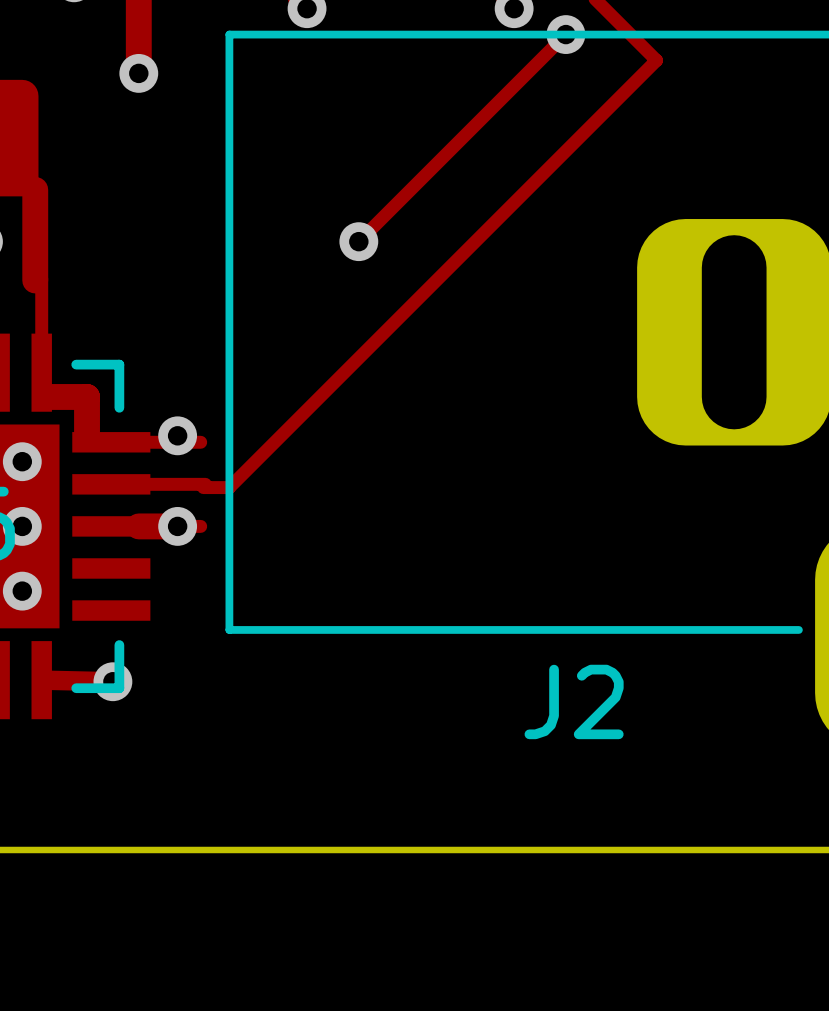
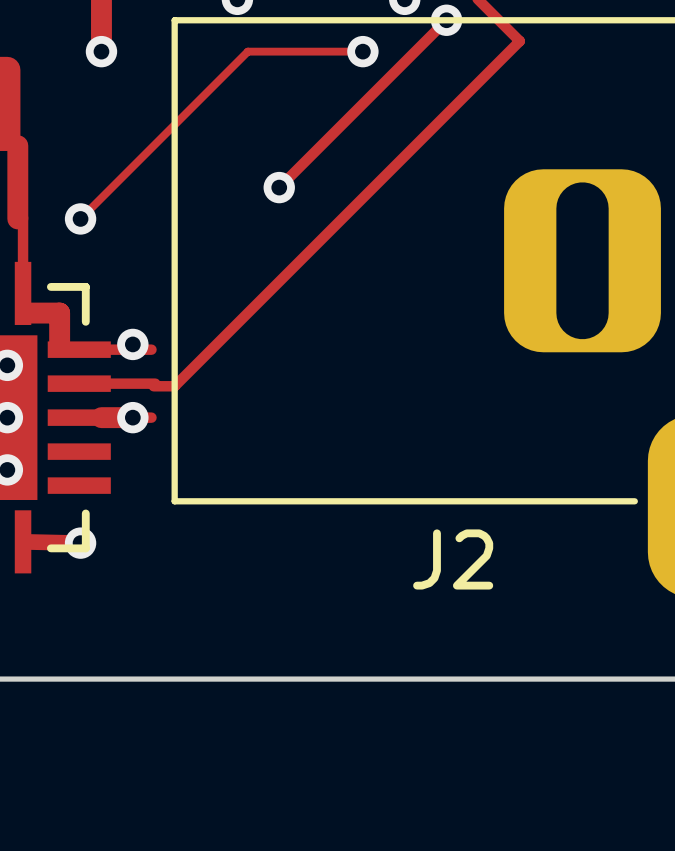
track: none -> (362, 51) (247, 51) (80, 218)
via: none -> (362, 51)
via: none -> (80, 218)

